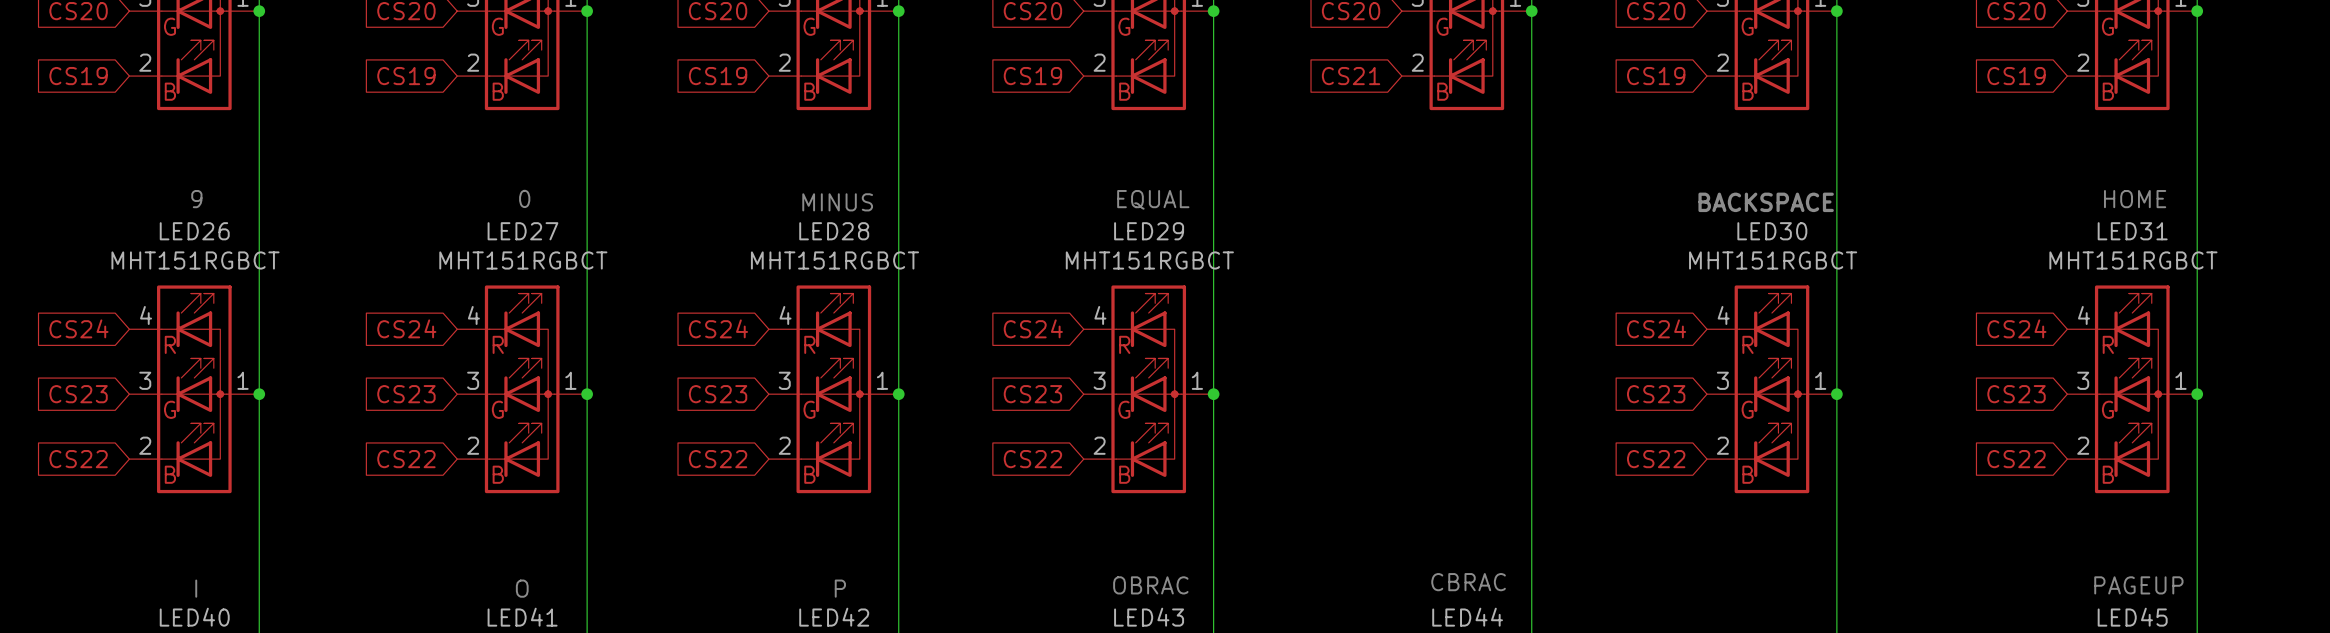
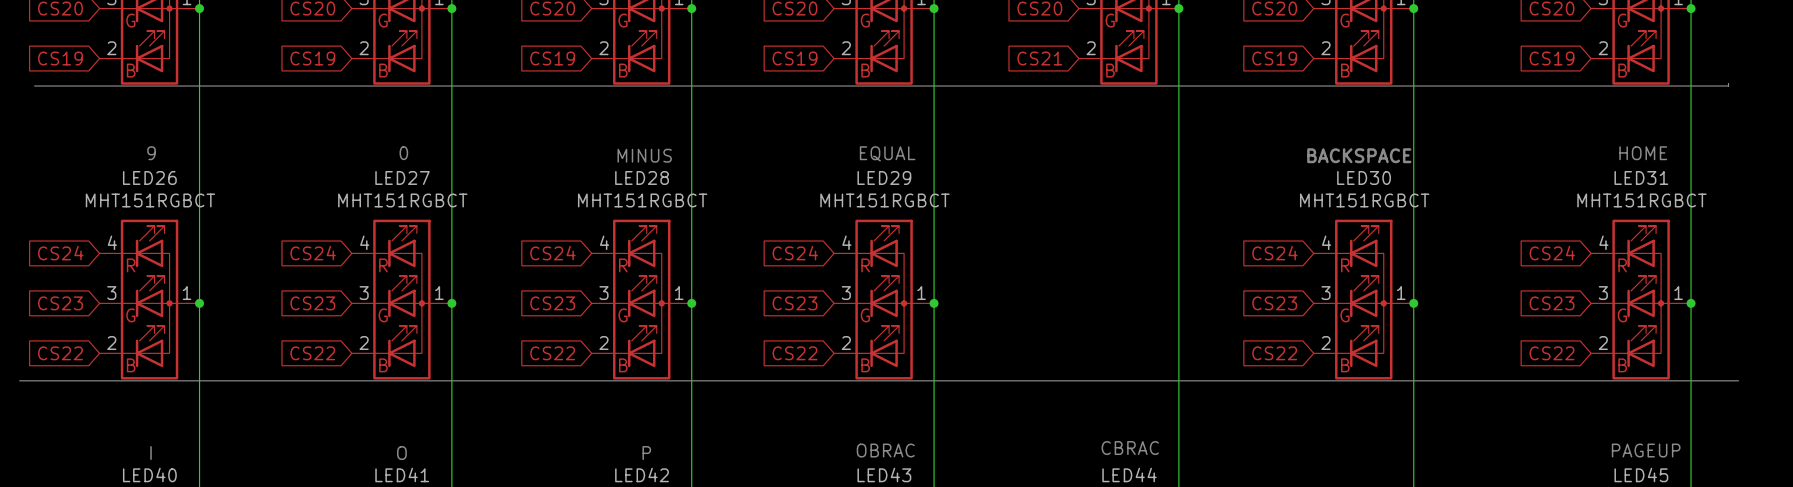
line: none -> (1728, 83) (1728, 86) (34, 86)
line: none -> (19, 380) (1738, 380)

